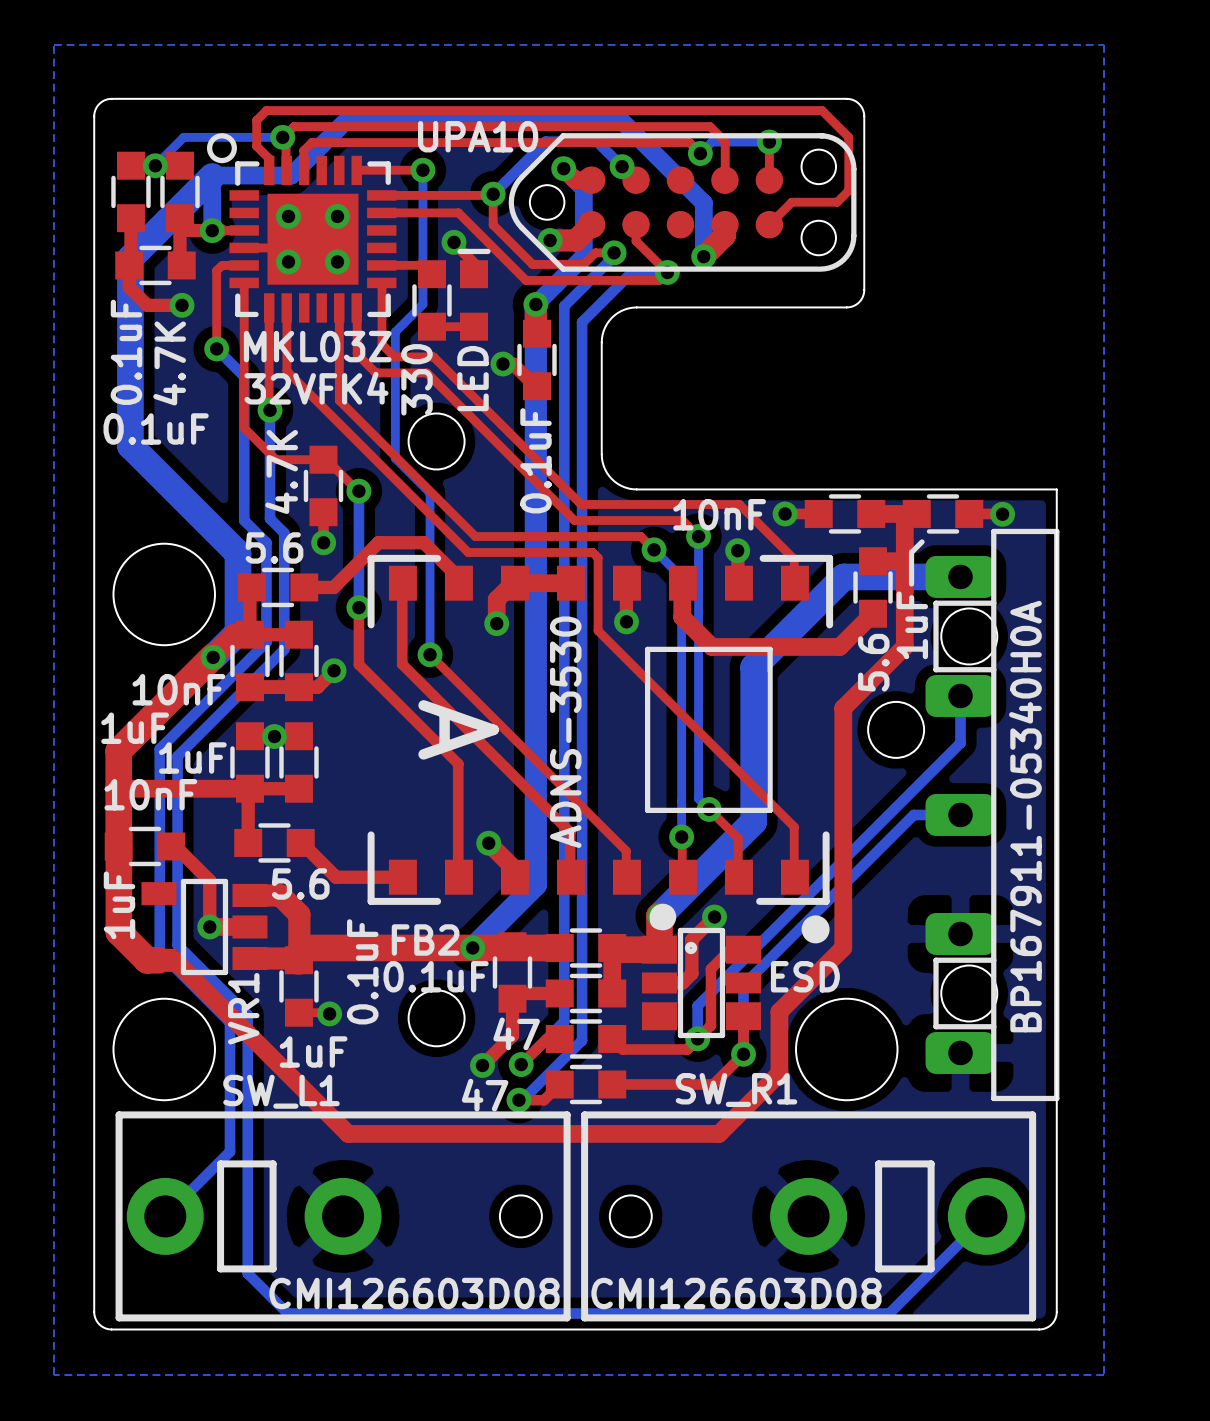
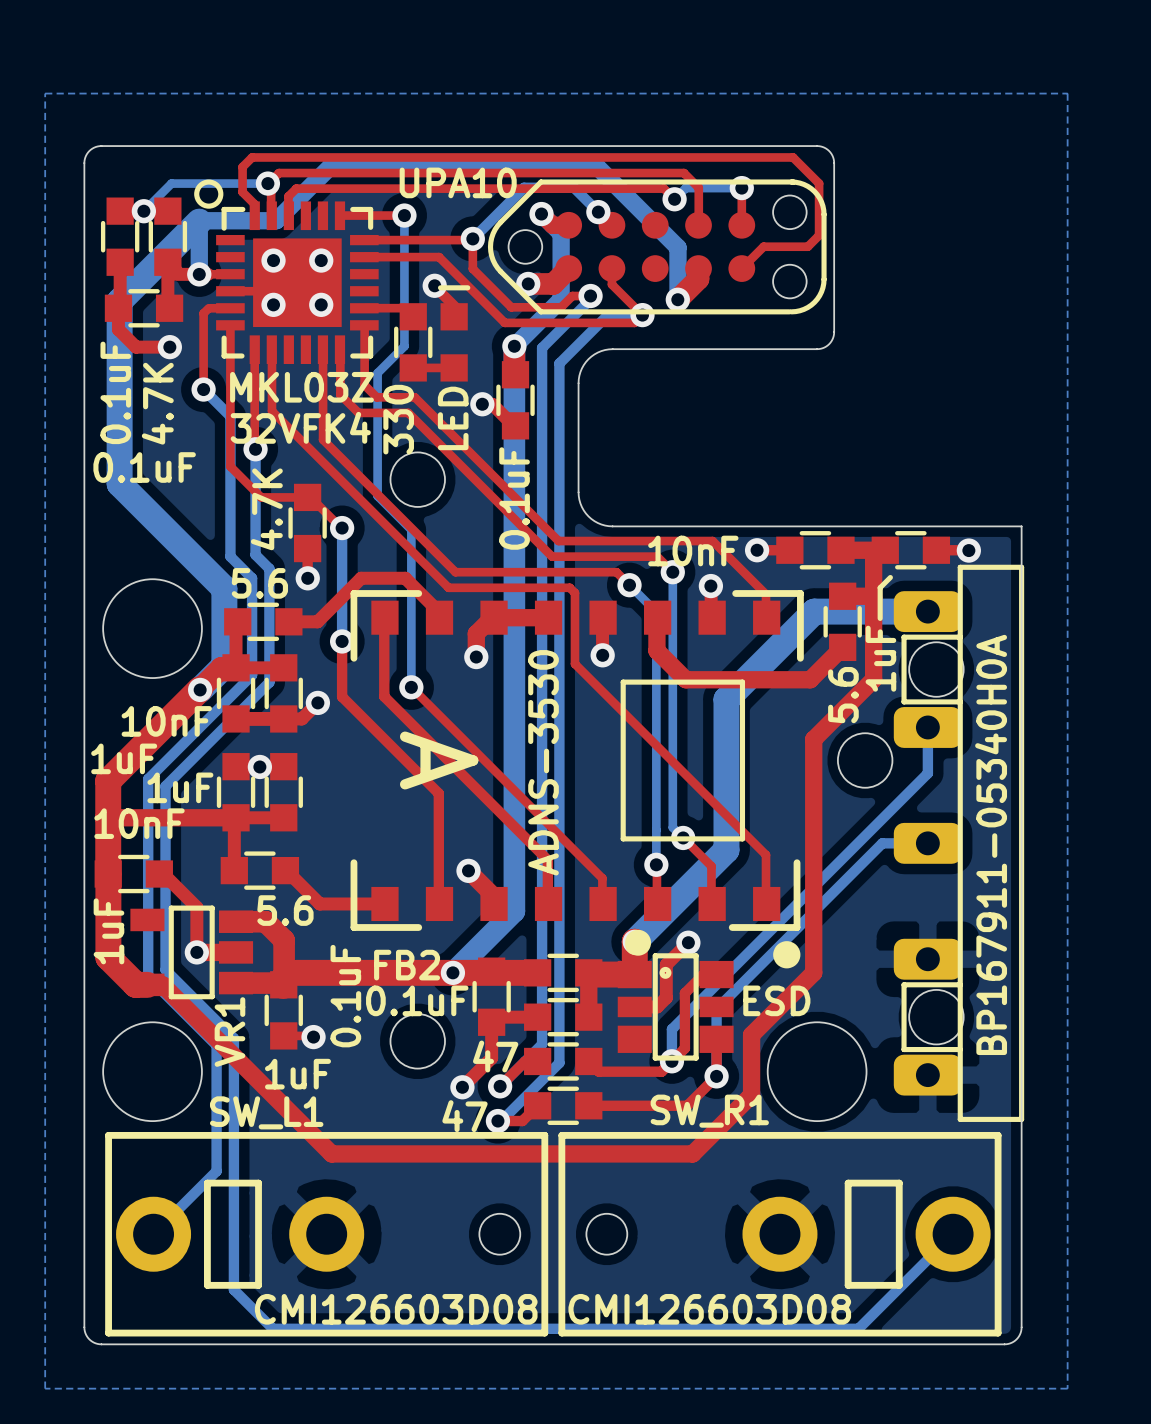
part footprint: [457, 248, 491, 341] -> [437, 285, 471, 382]

